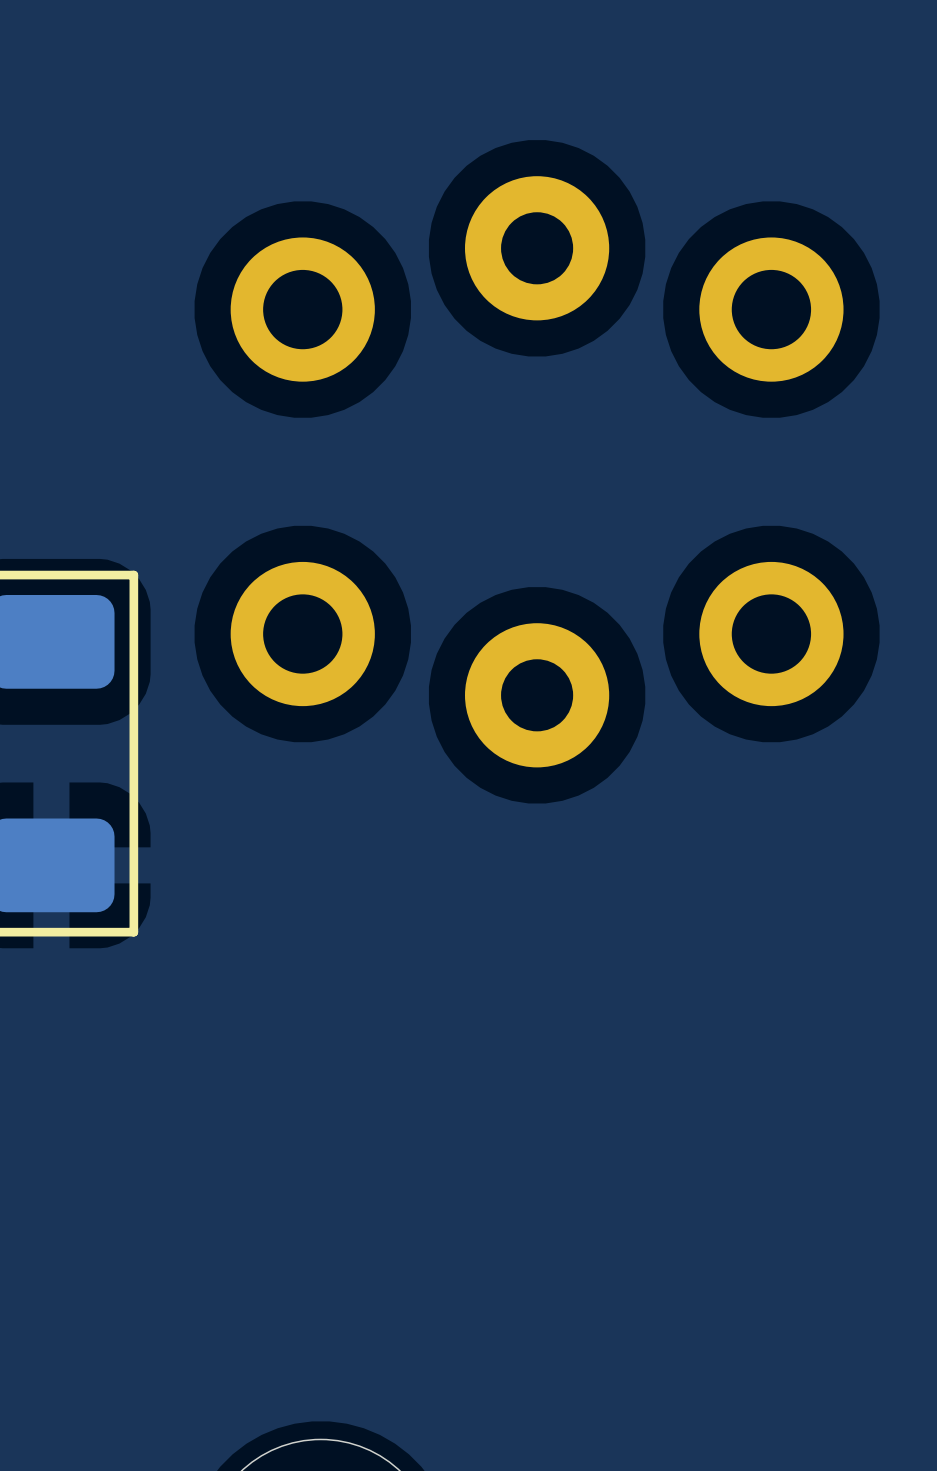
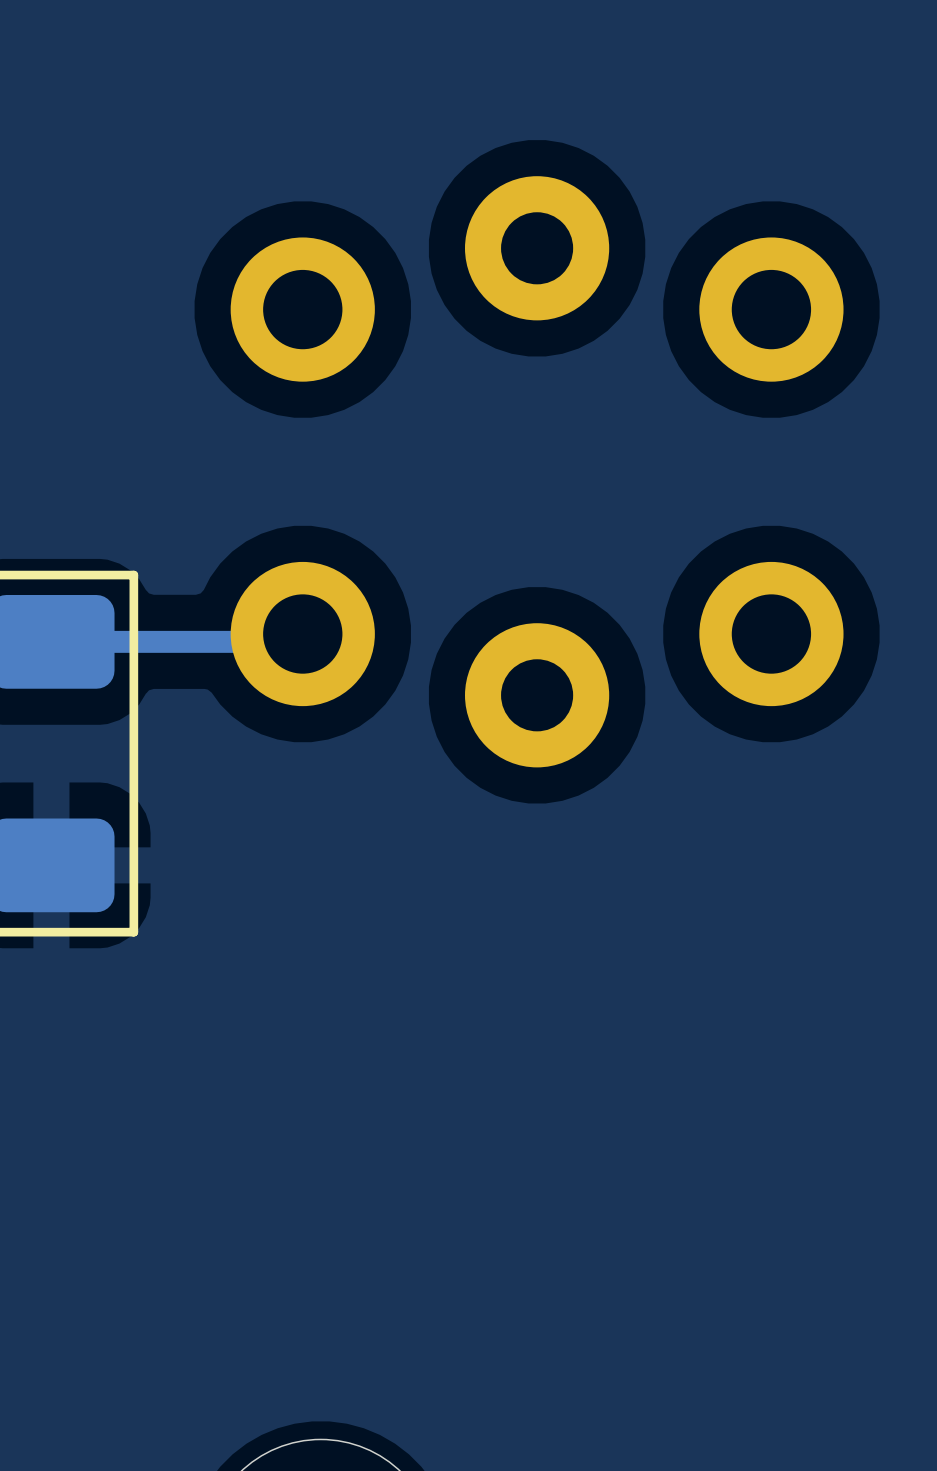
track: none -> (302, 634) (294, 641) (51, 641)

